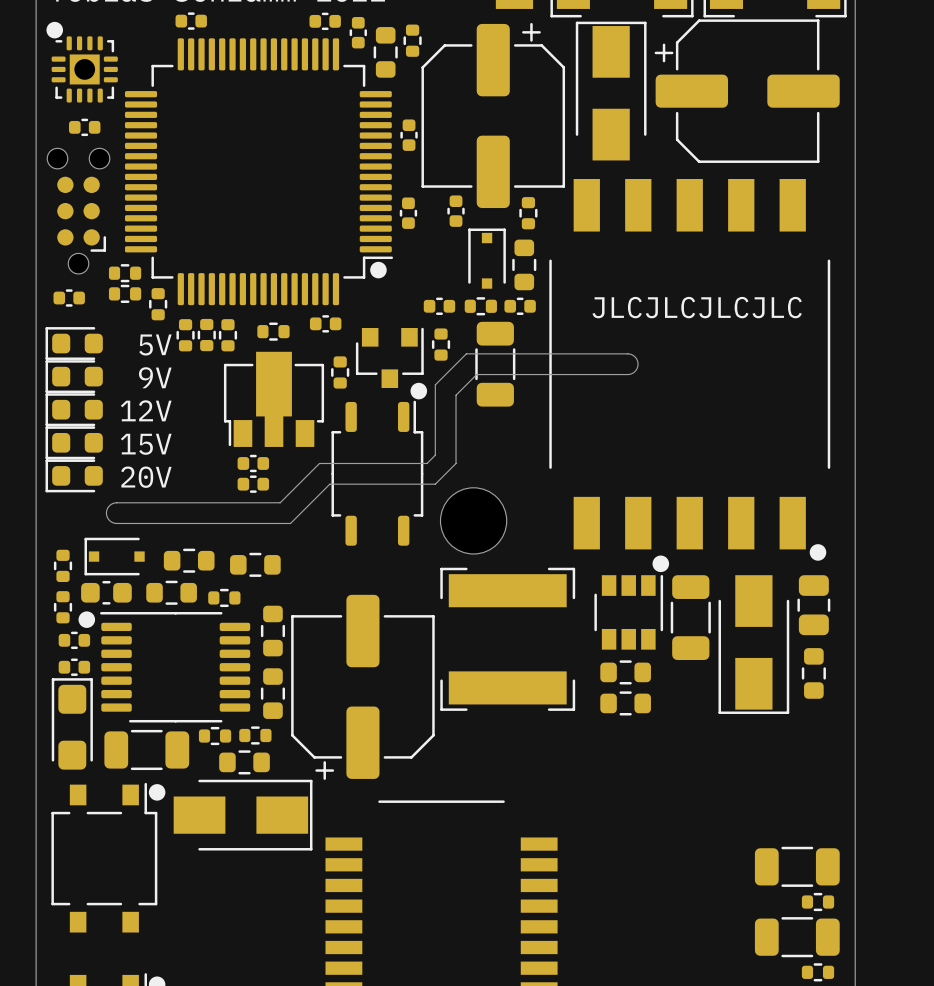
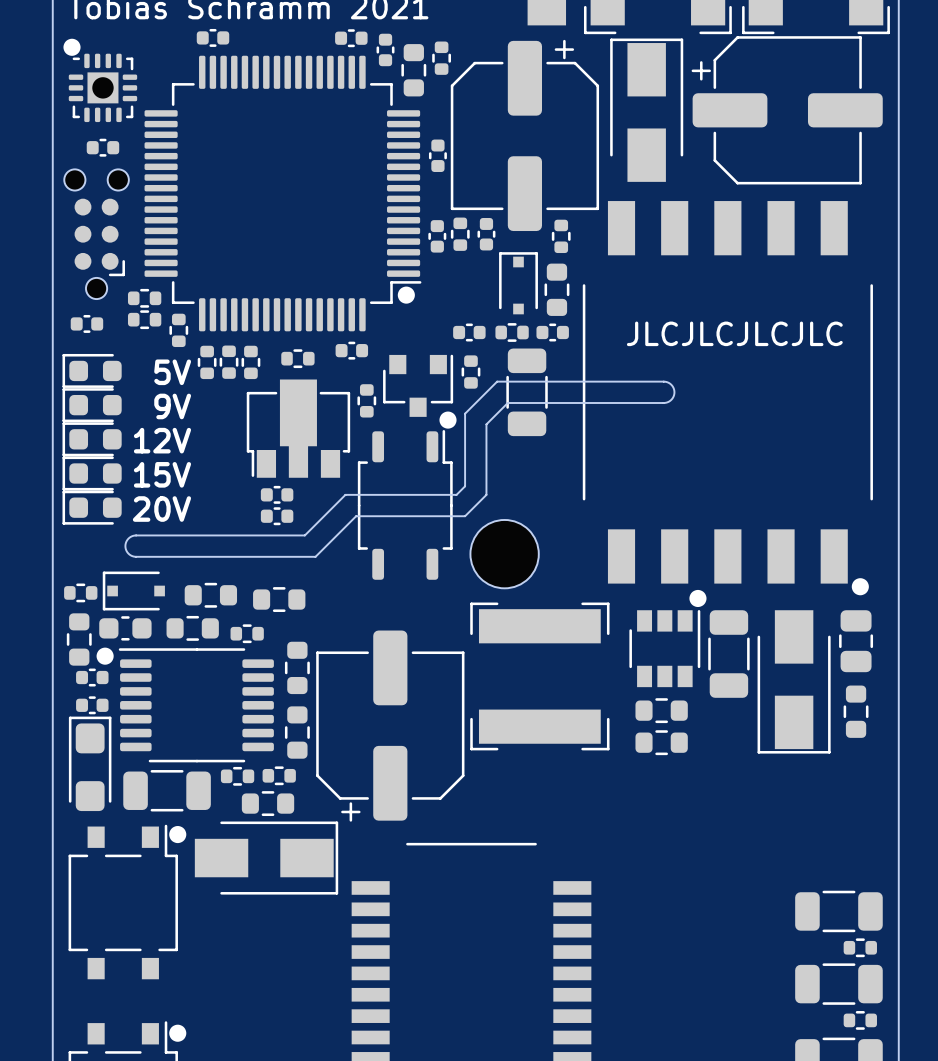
part: none -> (460, 234)
part rotation: 0° (63, 565) -> 90° clockwise (80, 592)
part footprint: [53, 591, 73, 624] -> [66, 613, 92, 666]

